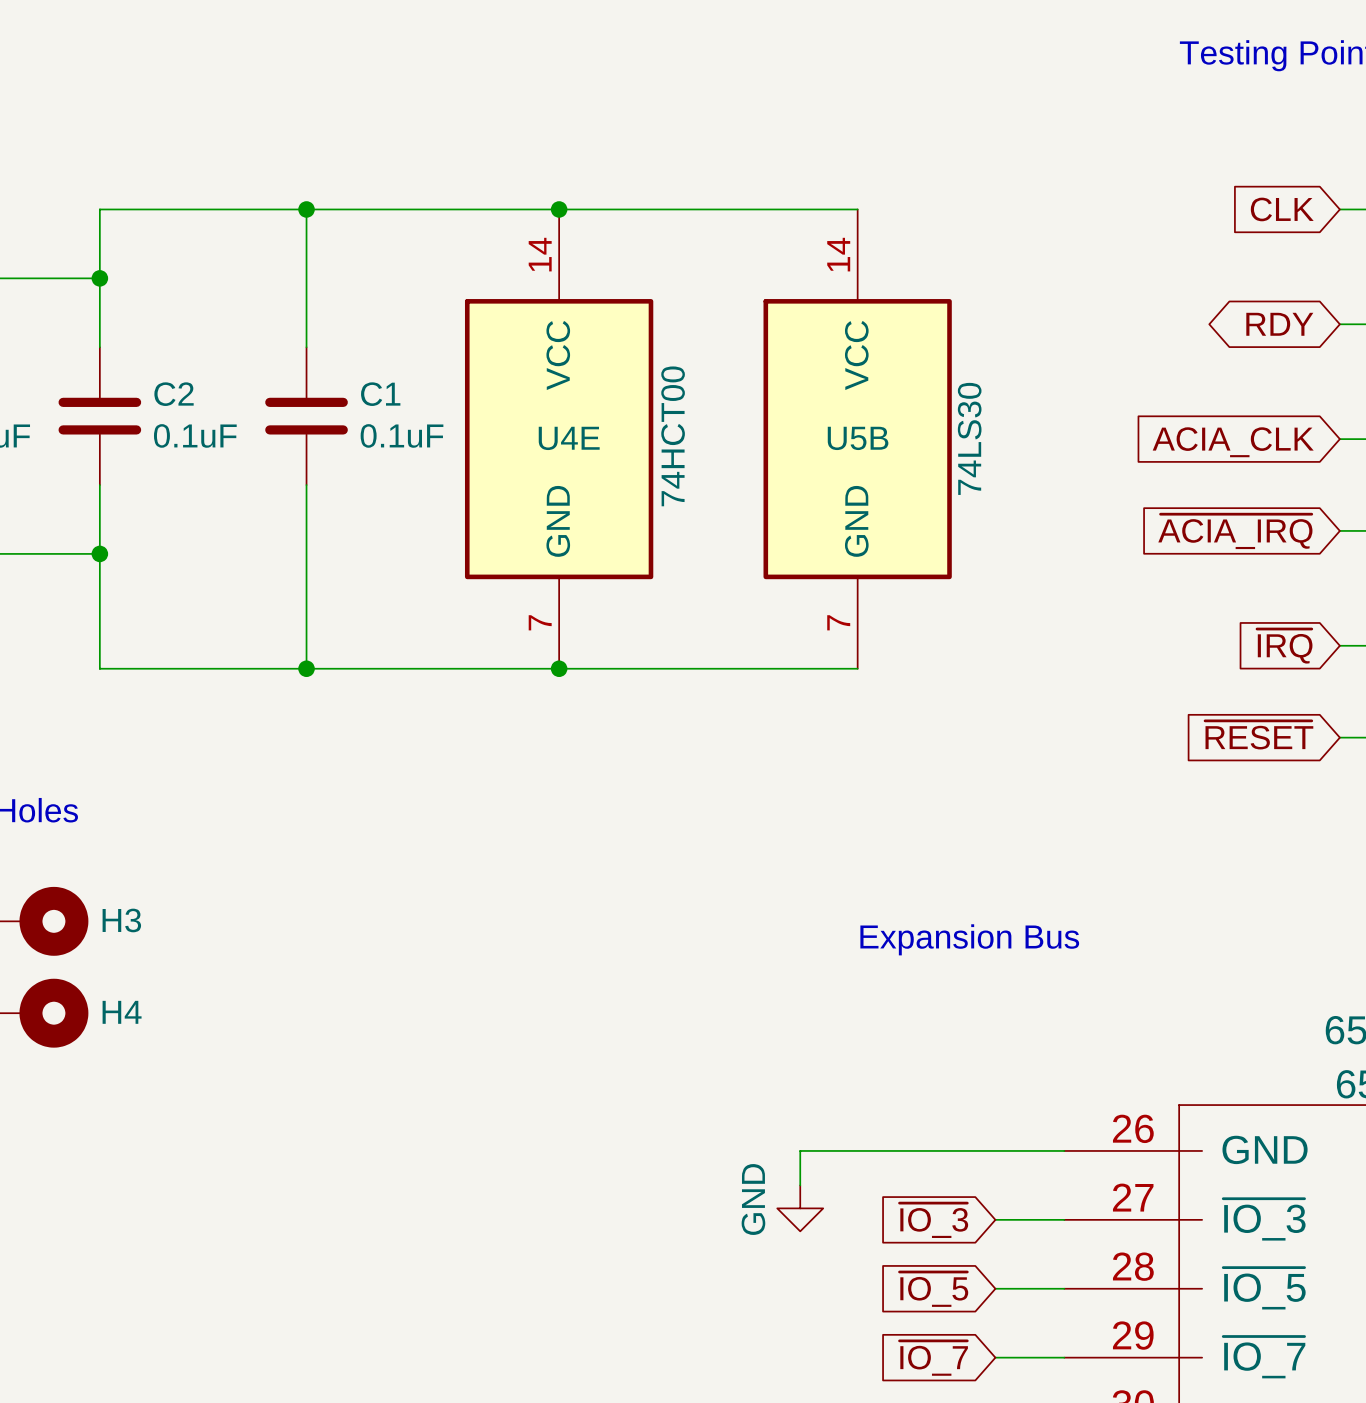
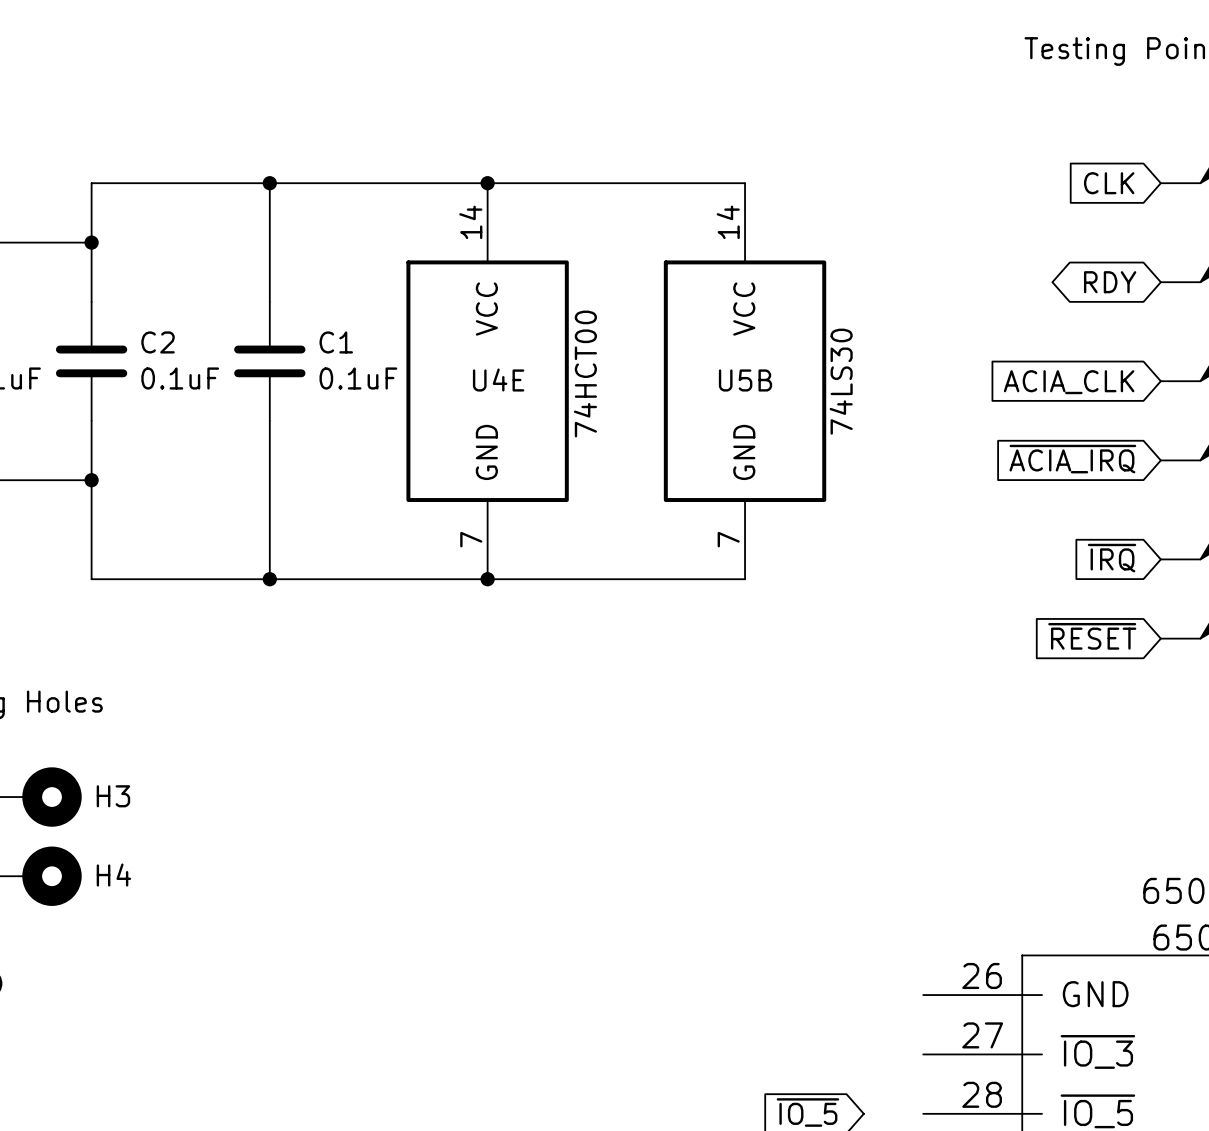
text: Expansion Bus (969, 939) -> none
wire: (1064, 1150) (800, 1150) (800, 1185) -> none
power symbol: GND (800, 1208) -> none
wire: (995, 1219) (1064, 1219) -> none
global label: ~{IO_3} (933, 1220) -> none
wire: (995, 1288) (1064, 1288) -> none

